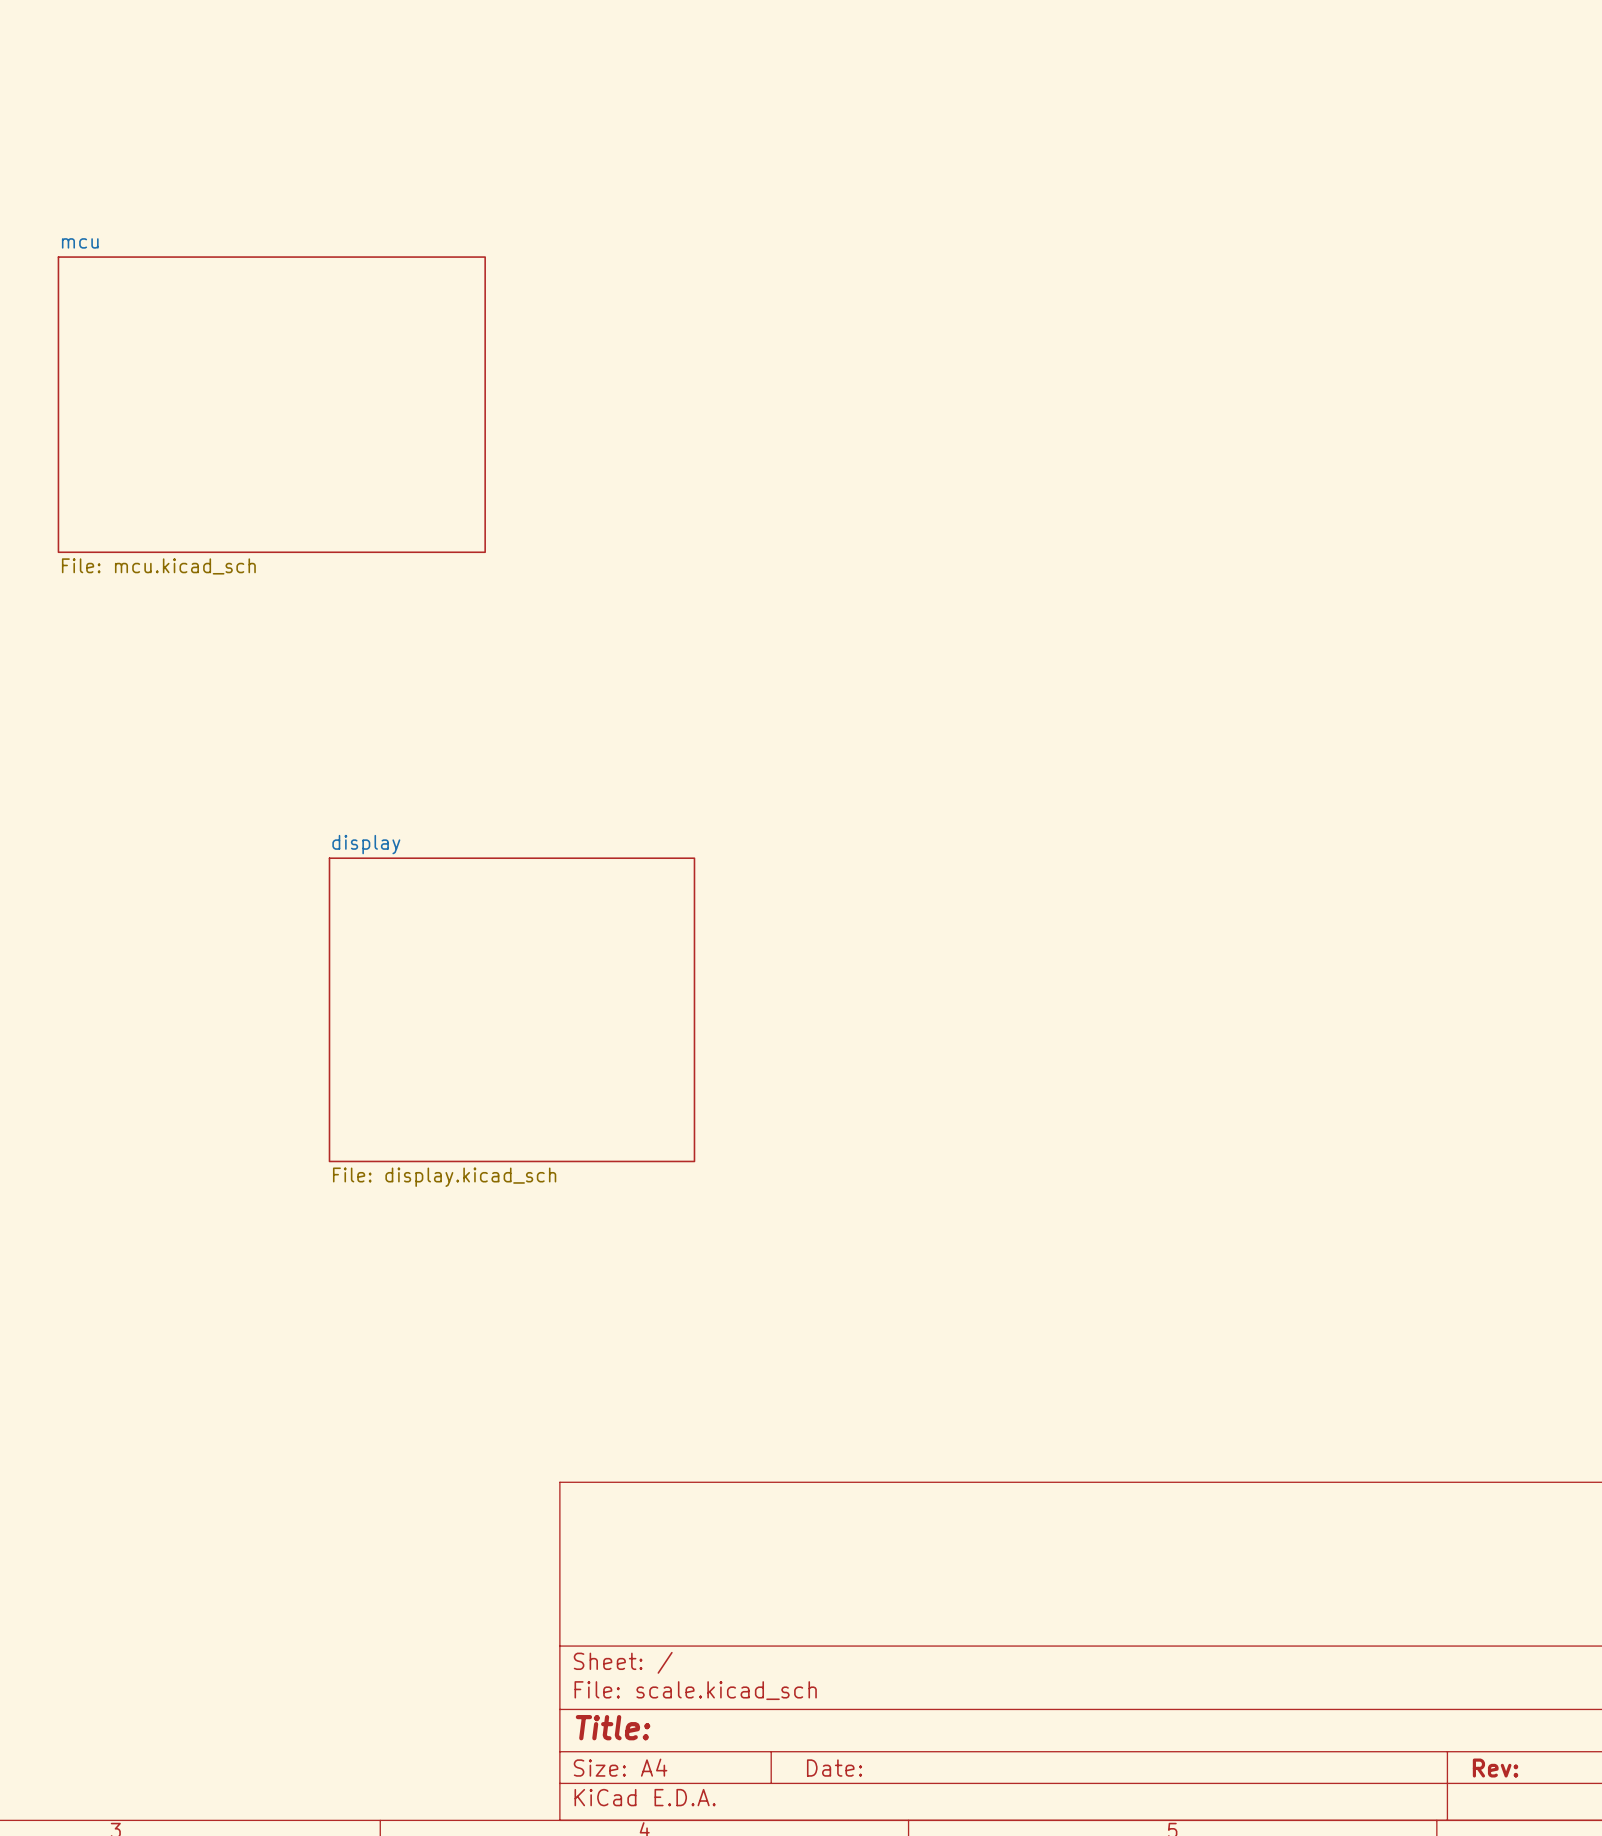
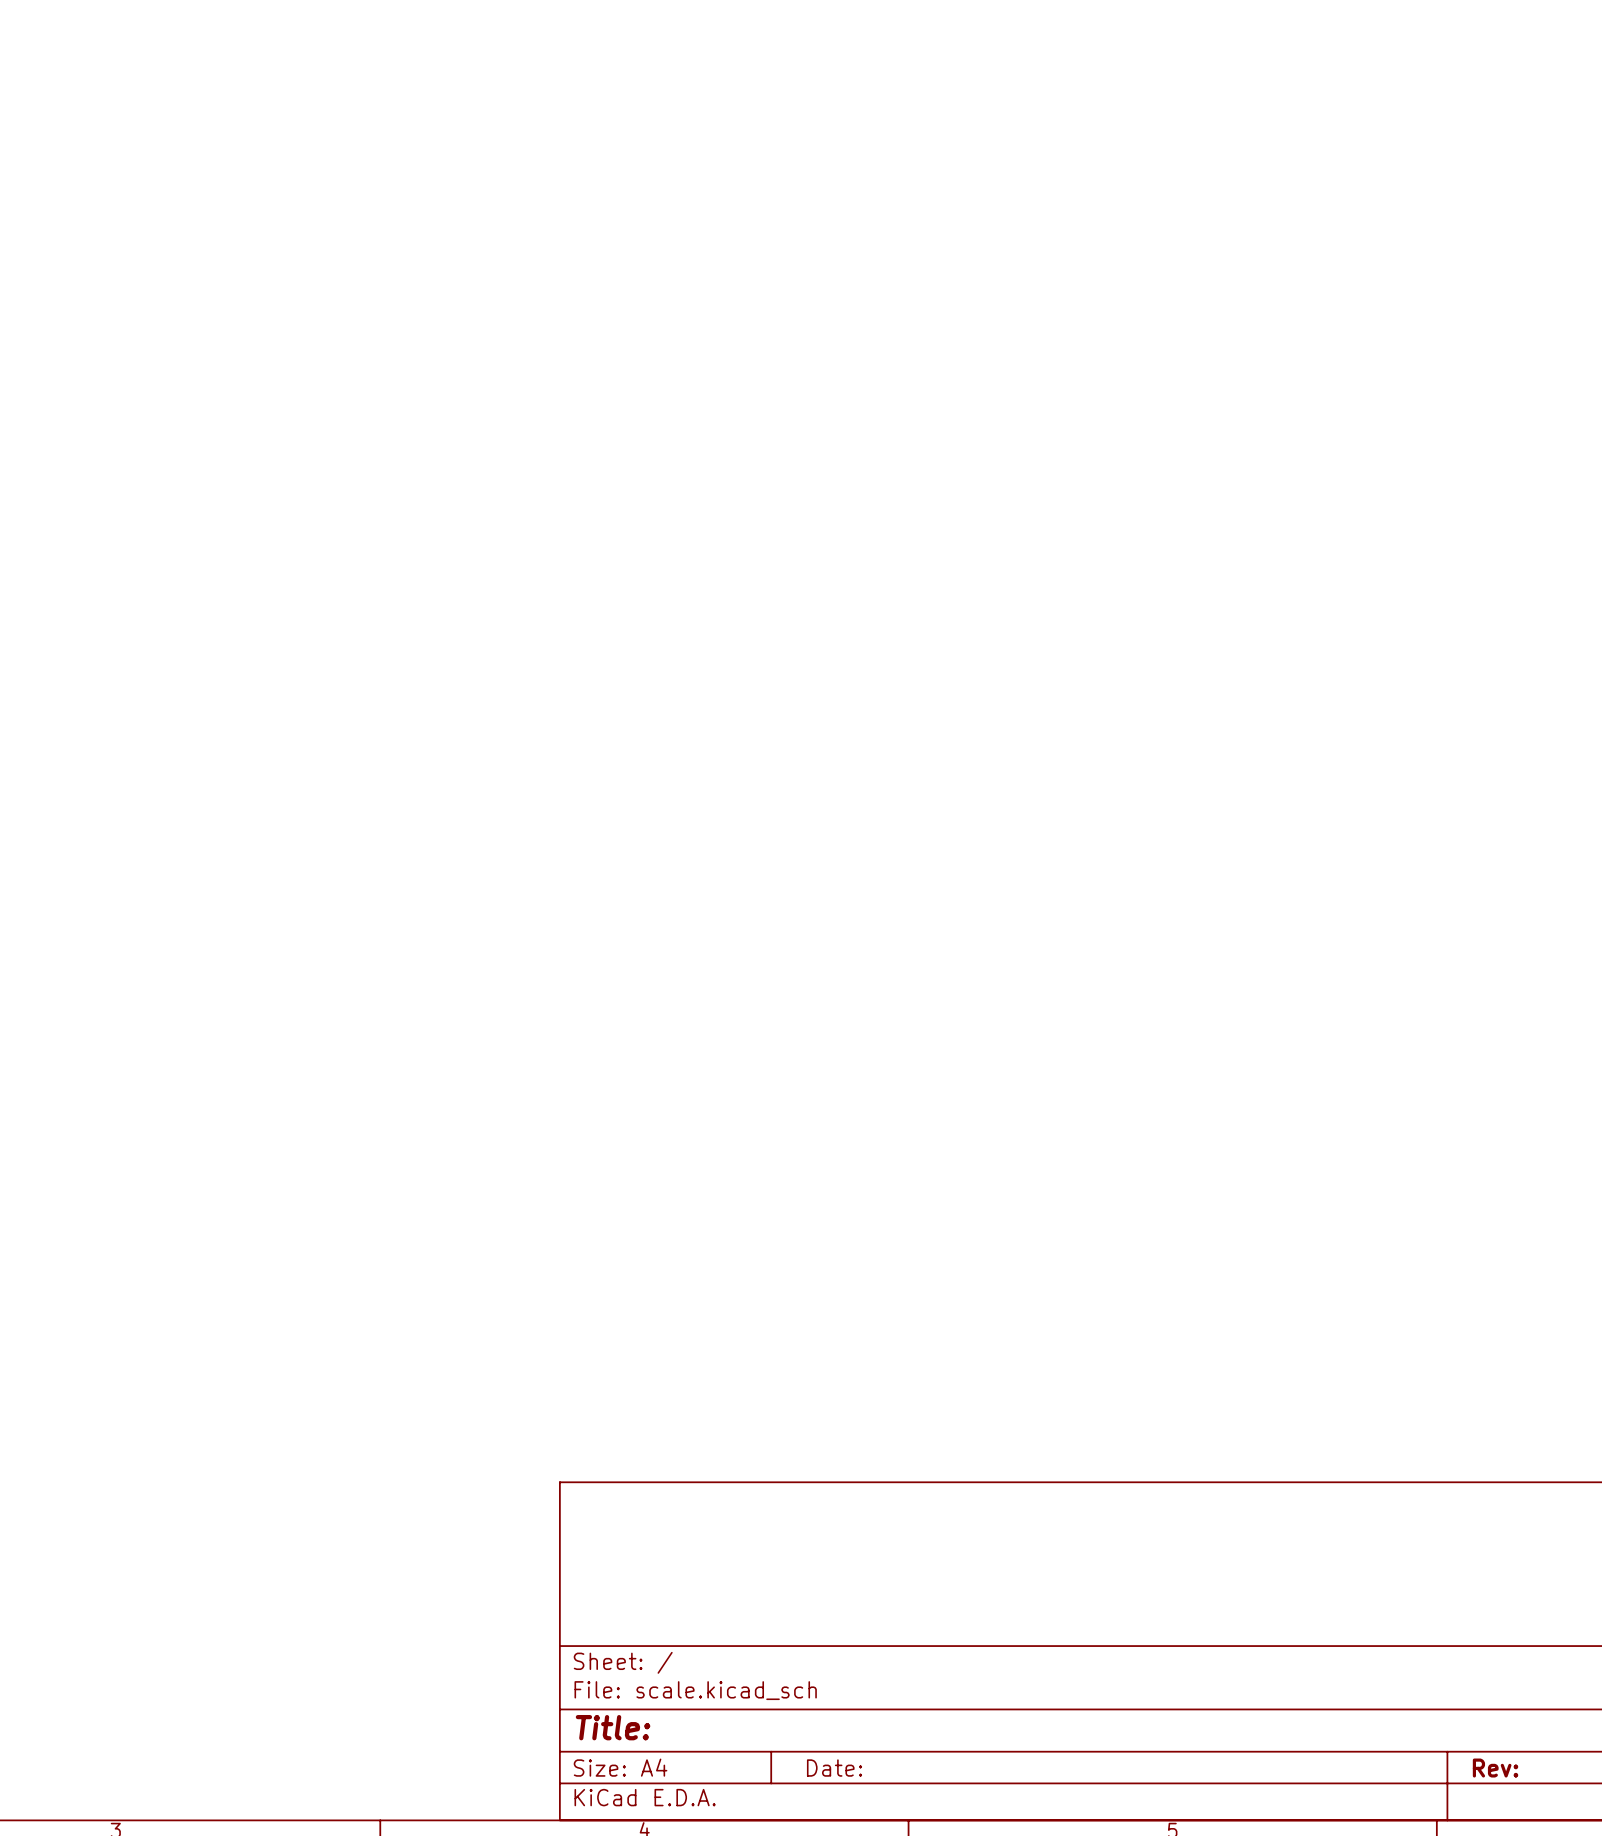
sheet mcu: File: mcu.kicad_sch (271, 404) -> none
sheet display: File: display.kicad_sch (511, 1009) -> none

